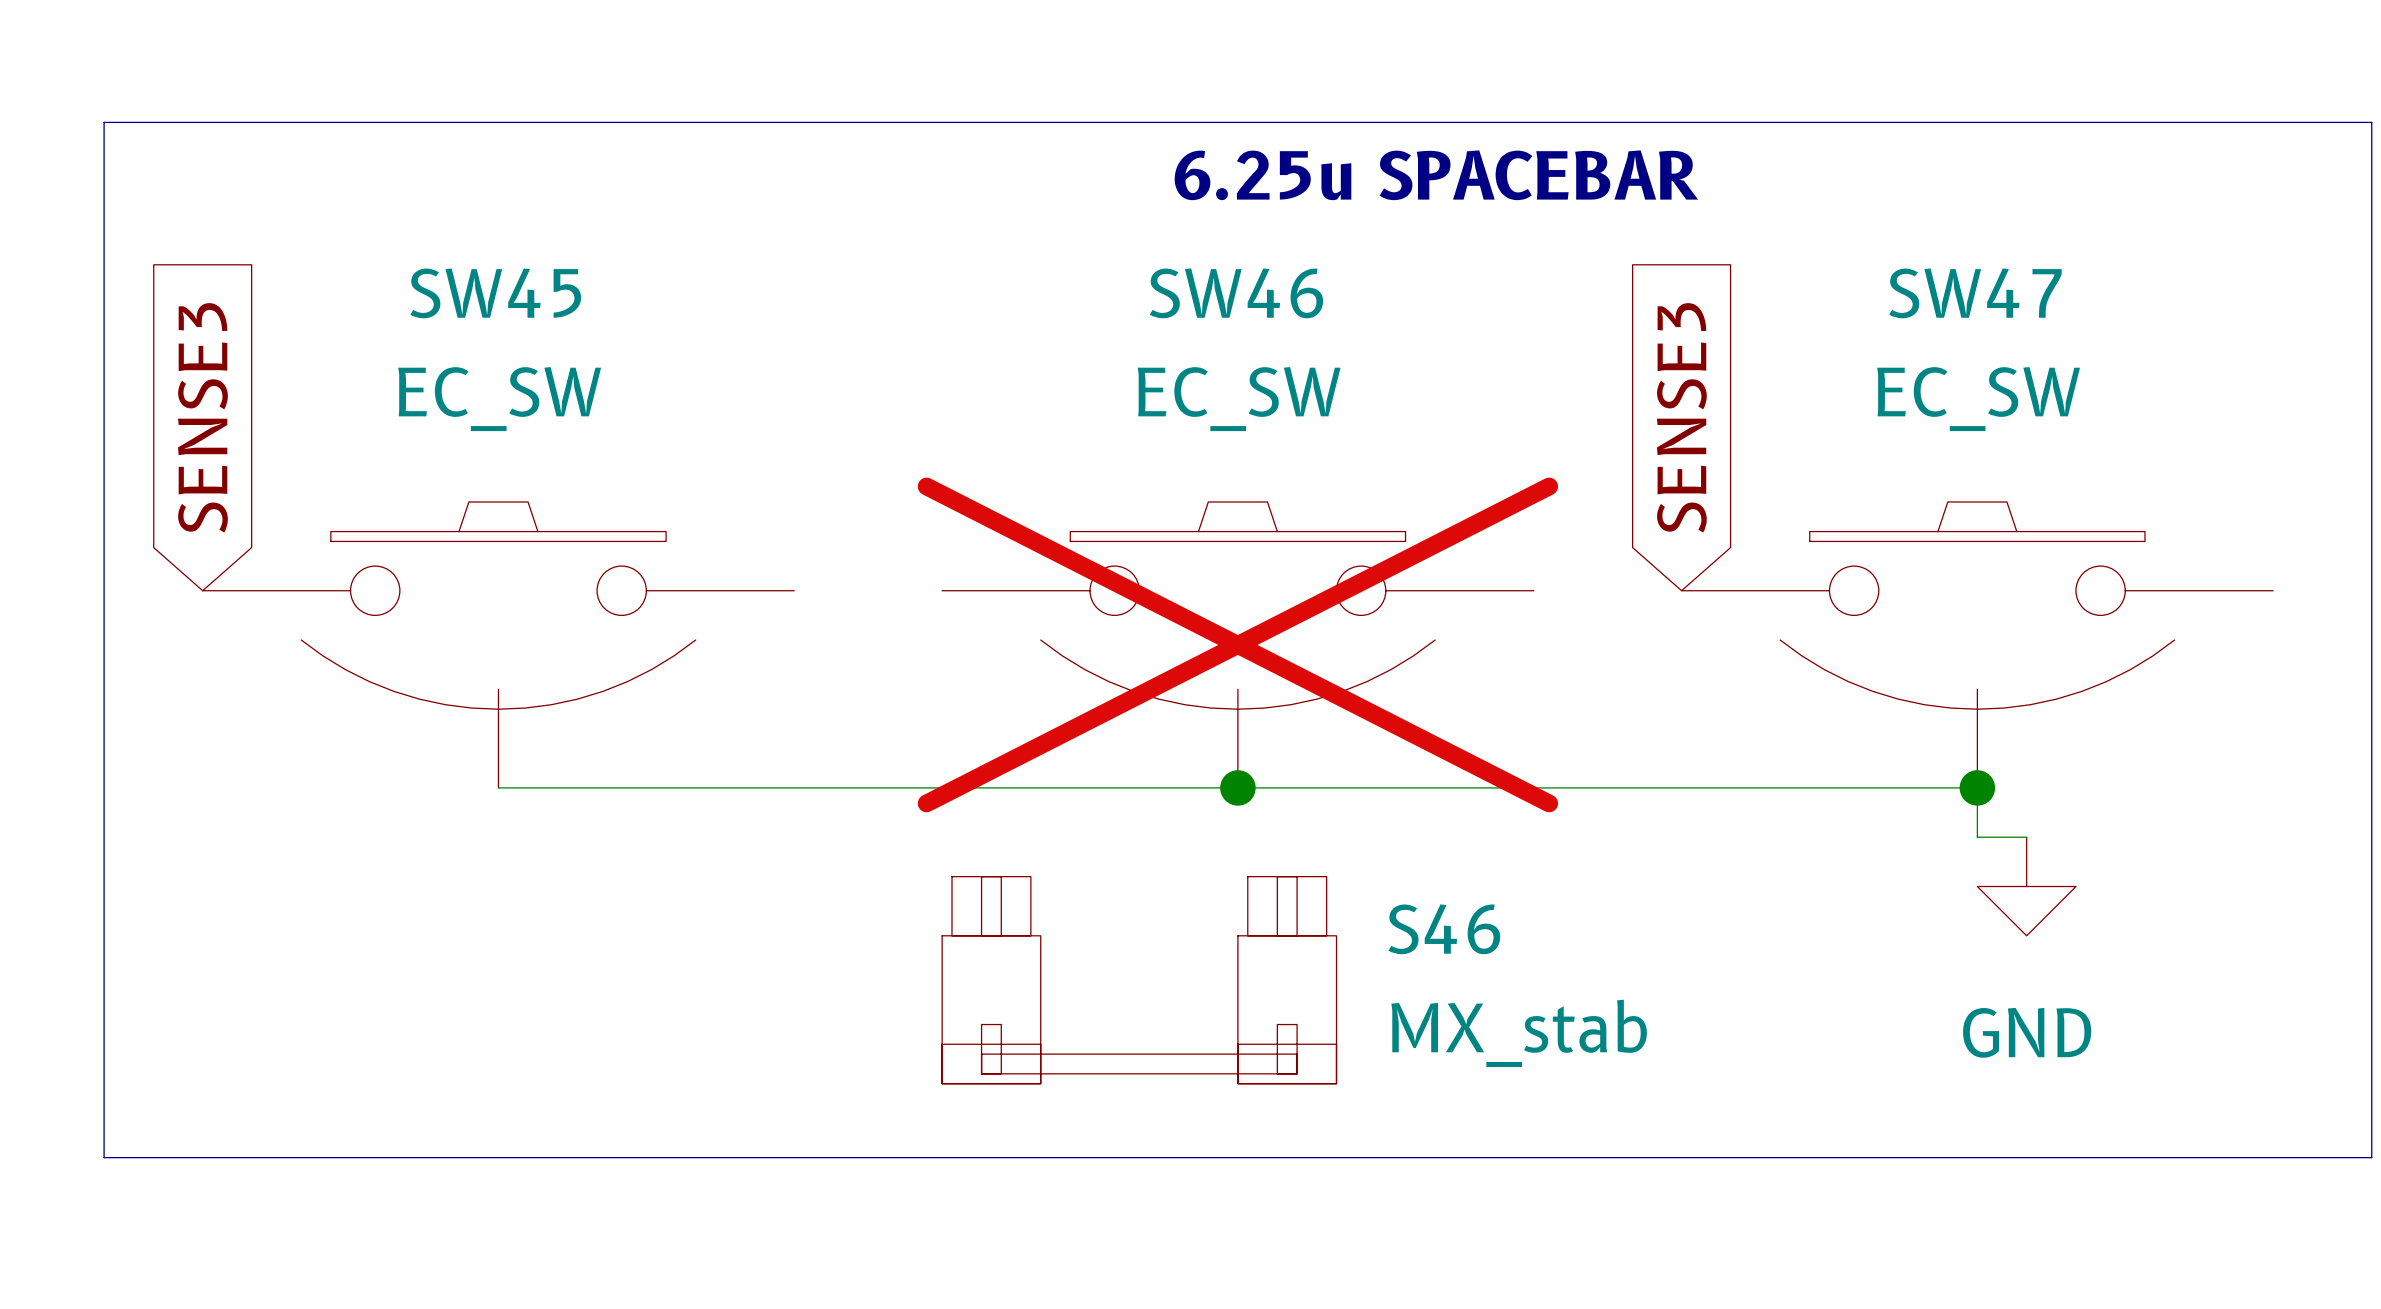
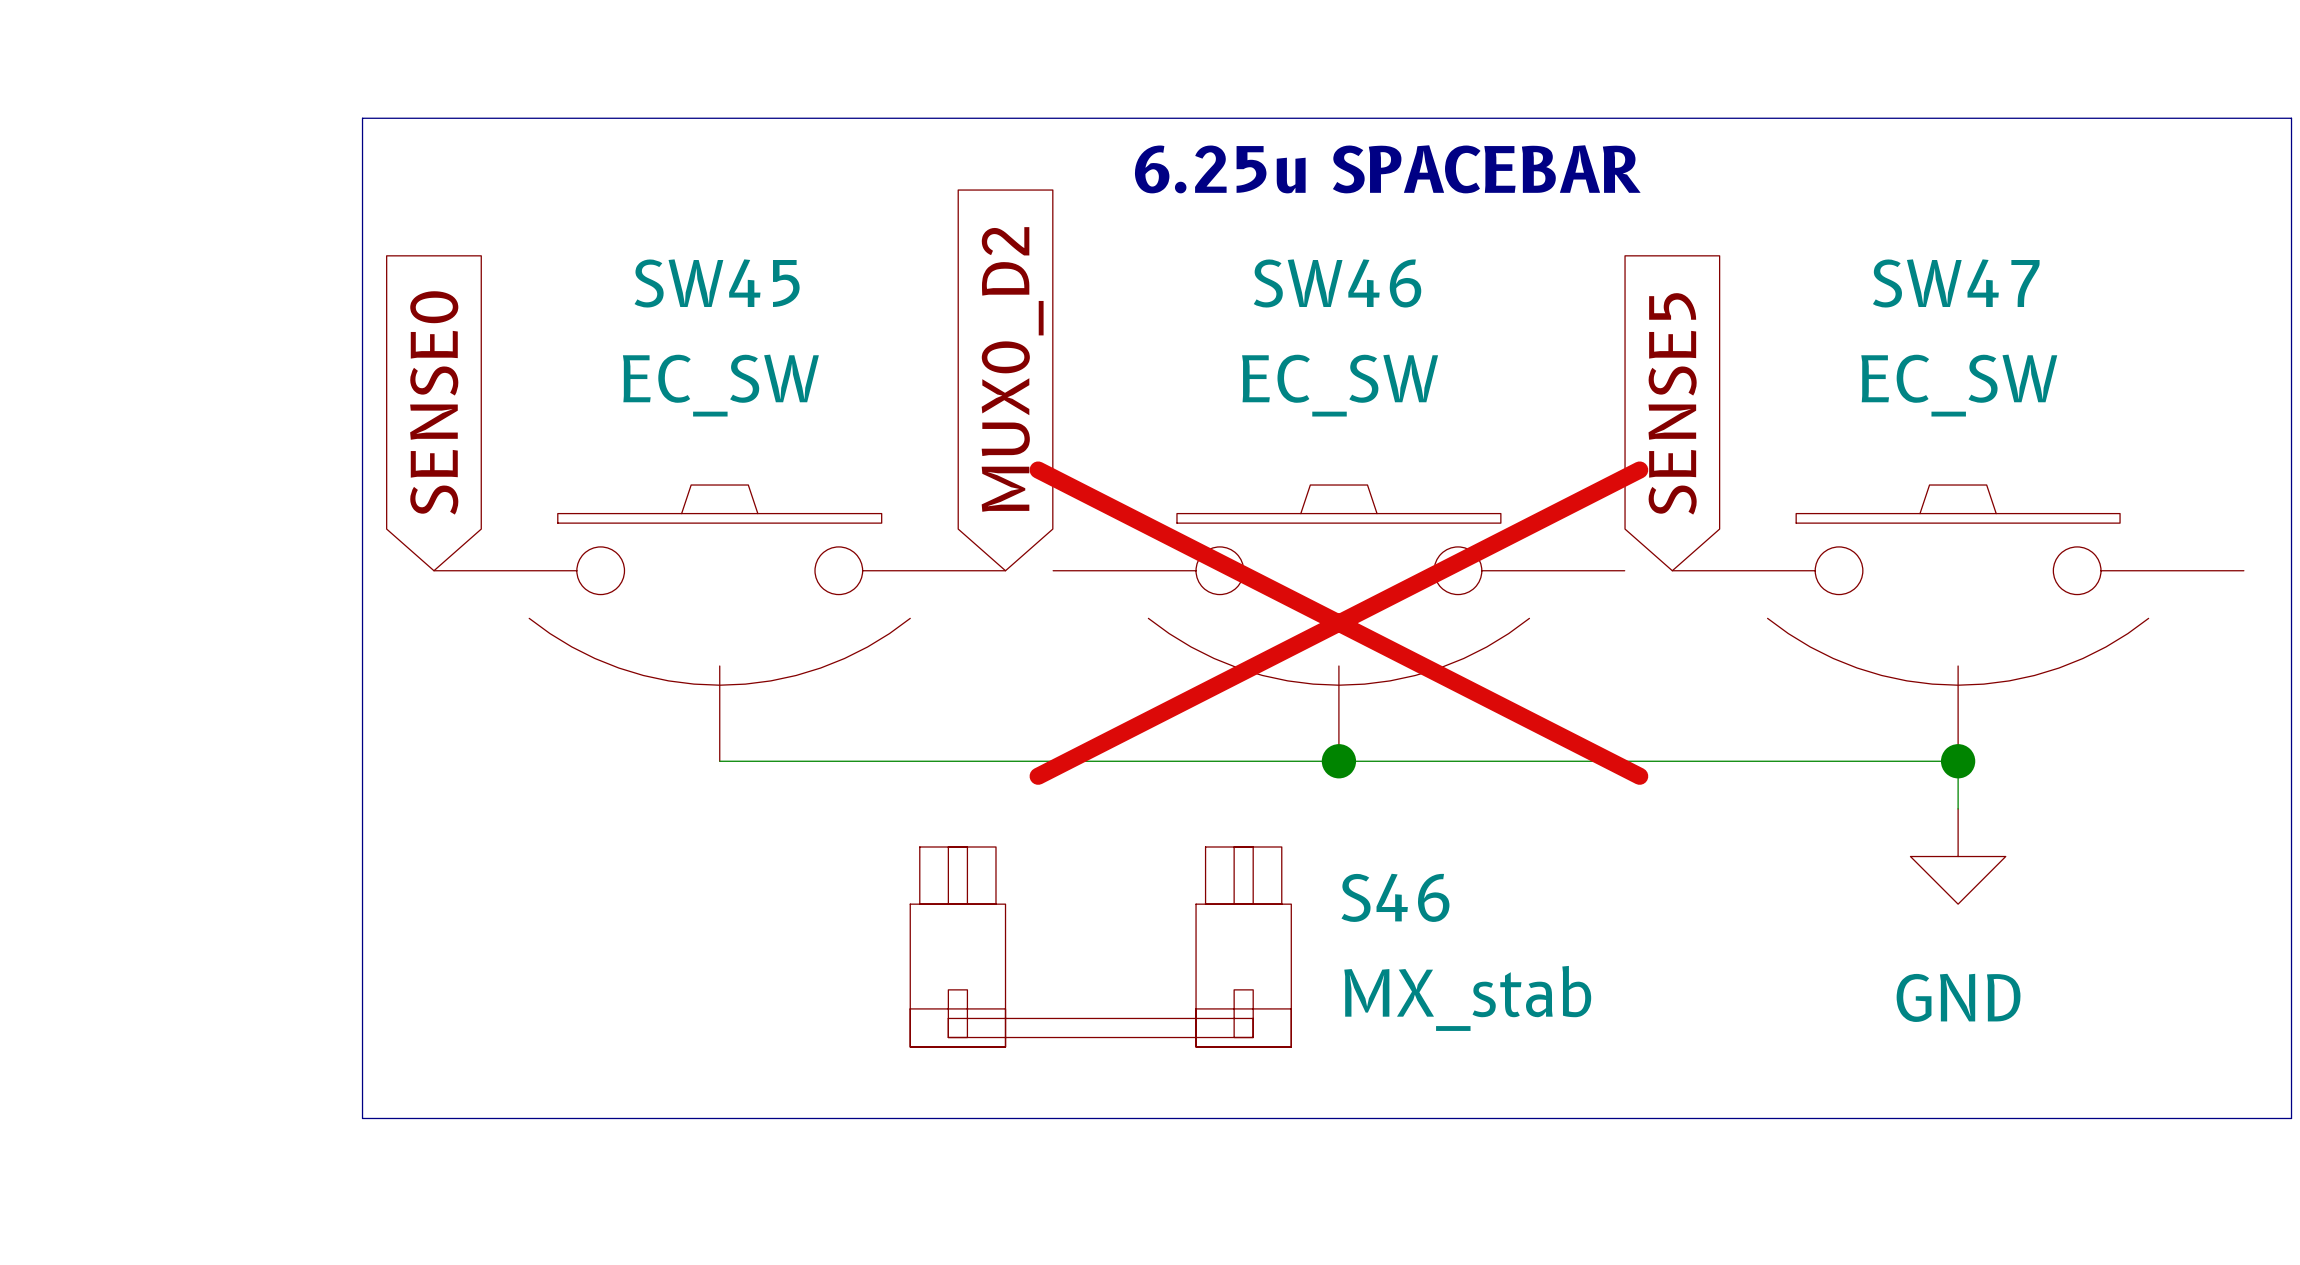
line: (375, 122) (104, 122) (104, 1157) (375, 1157) -> (362, 118) (362, 1118)
global label: none -> MUX0_D2 (1012, 369)
global label: SENSE3 (202, 417) -> none
global label: none -> SENSE0 (434, 402)
global label: SENSE3 (1681, 417) -> SENSE5 (1672, 403)
SW45 position: (498, 644) -> (719, 623)
SW46 position: (1237, 644) -> (1338, 623)
SW47 position: (1977, 644) -> (1958, 623)
wire: (498, 787) (744, 787) -> none
junction position: (1237, 787) -> (1338, 761)
wire: (1977, 787) (1977, 837) (2026, 837) -> (1910, 761) (1958, 761) (1958, 808)
junction position: (1977, 787) -> (1958, 761)

